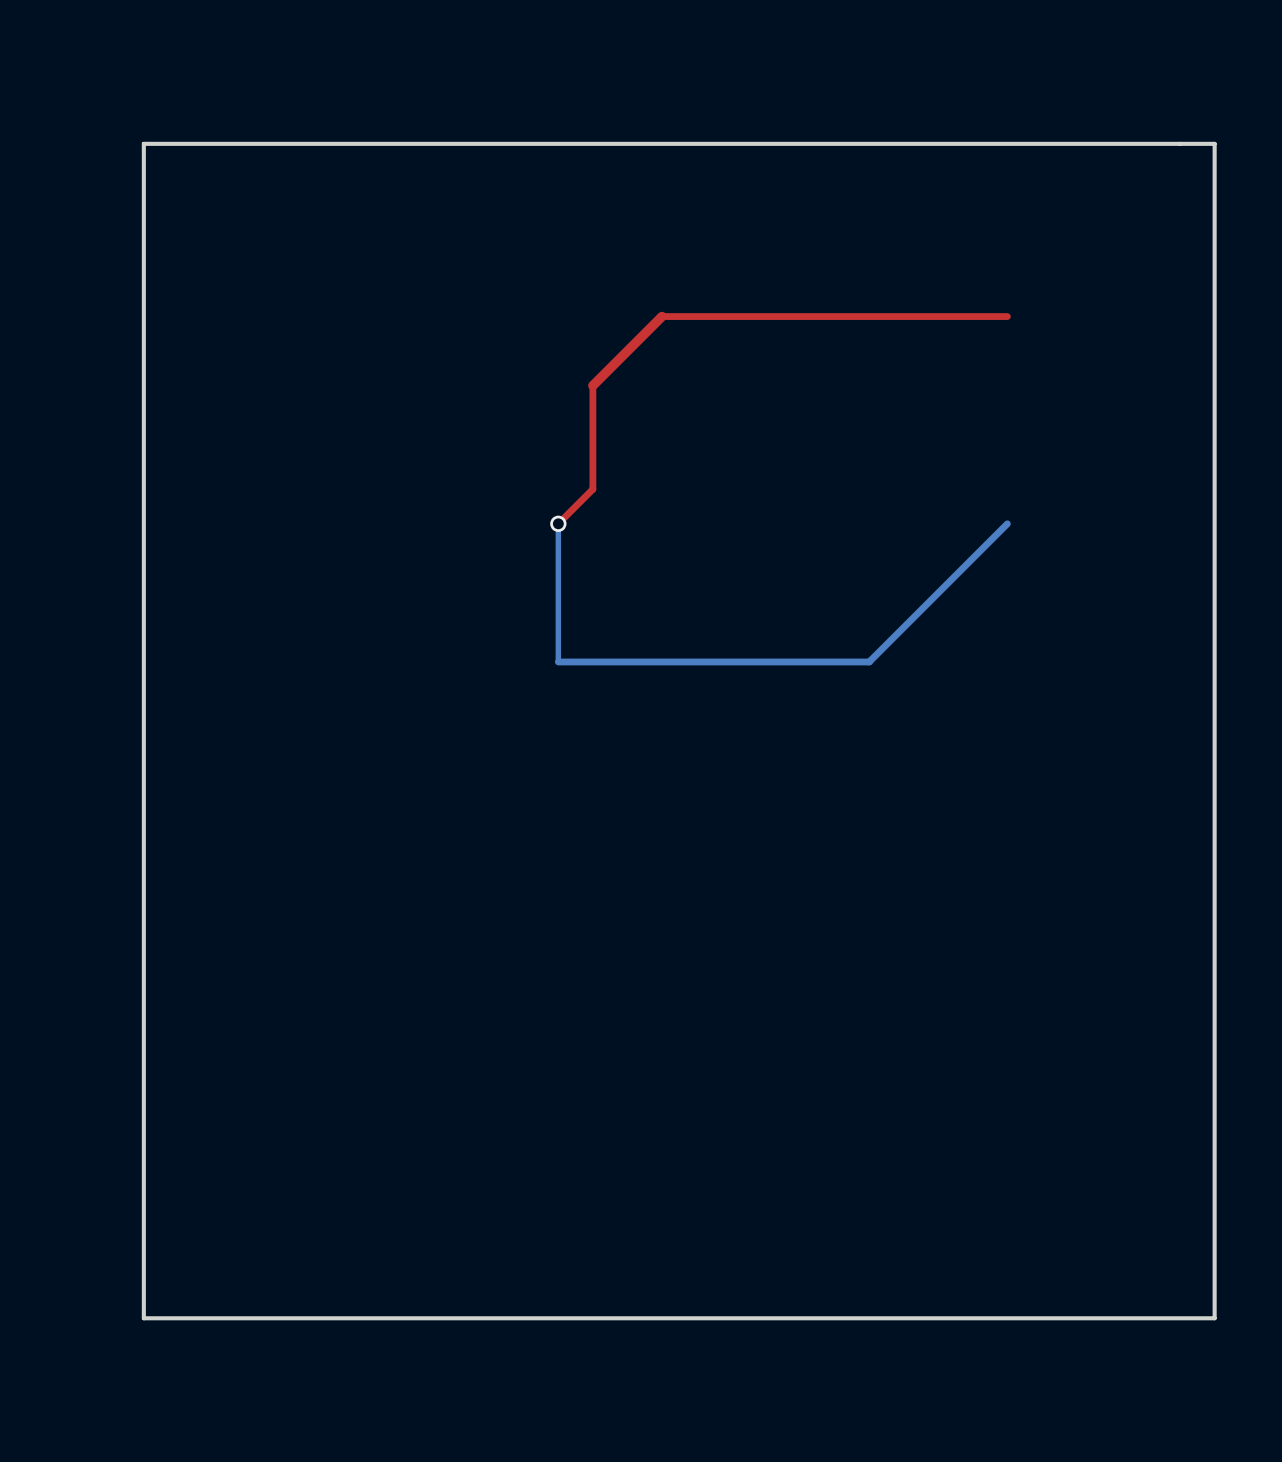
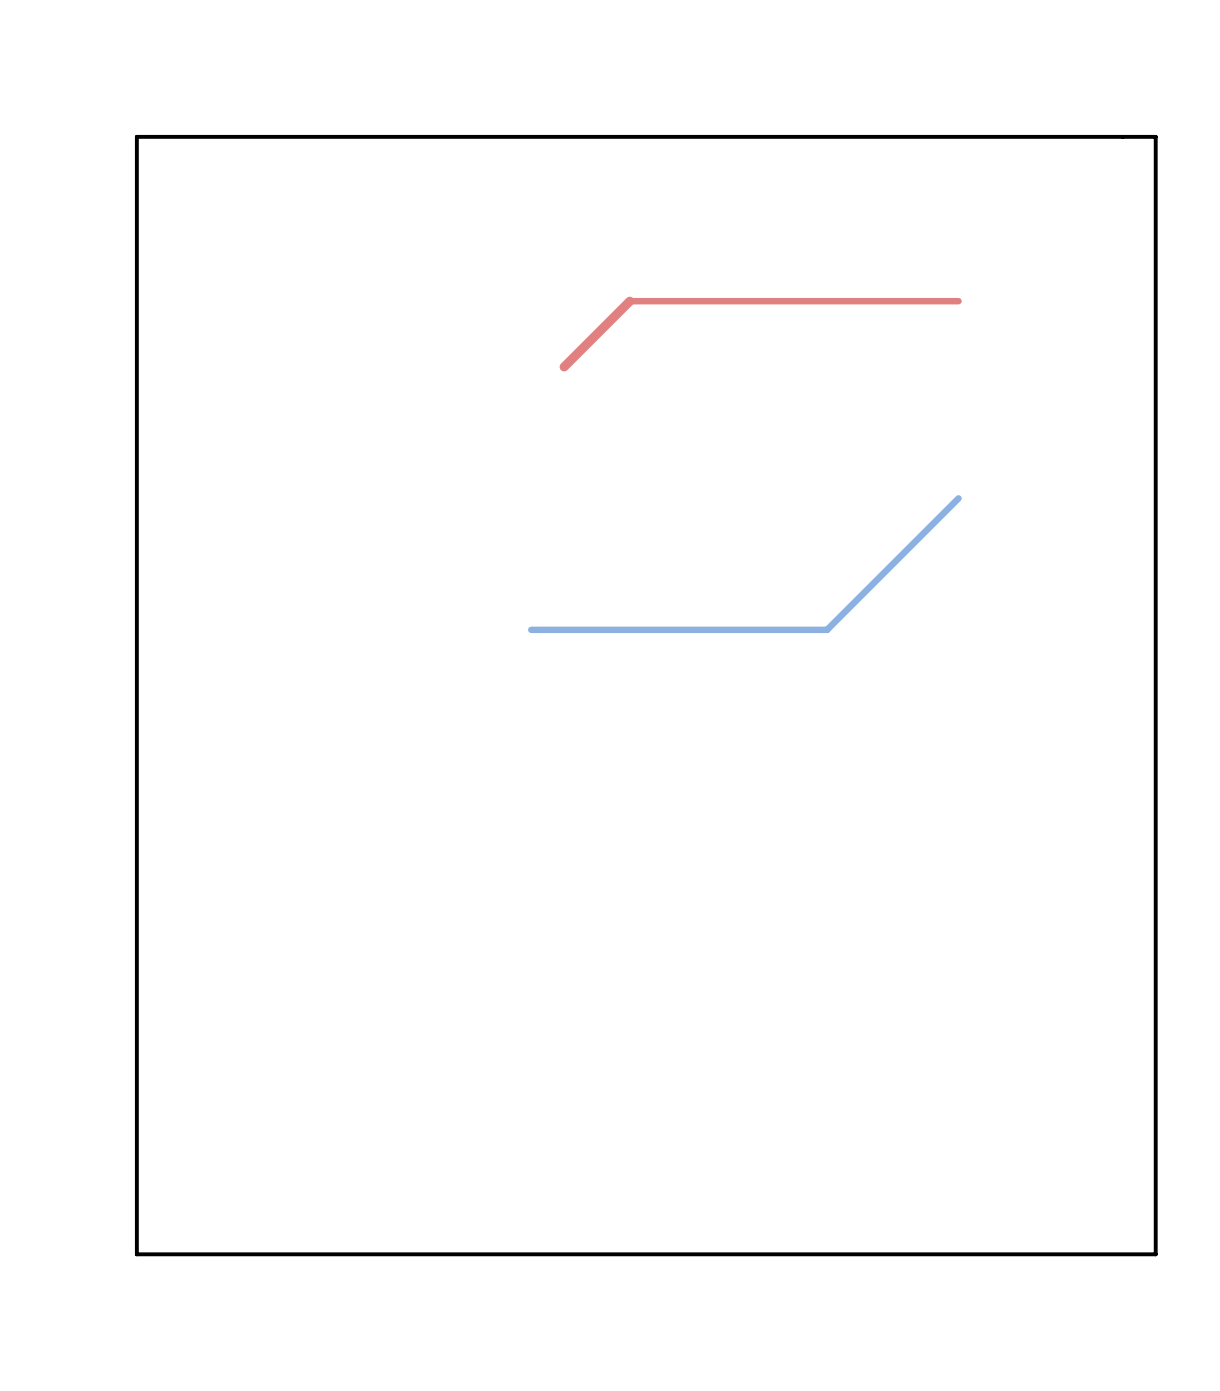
top track: (592, 385) (592, 489) (558, 523) -> none
bottom track: (558, 523) (558, 661) -> none
via: (558, 523) -> none

